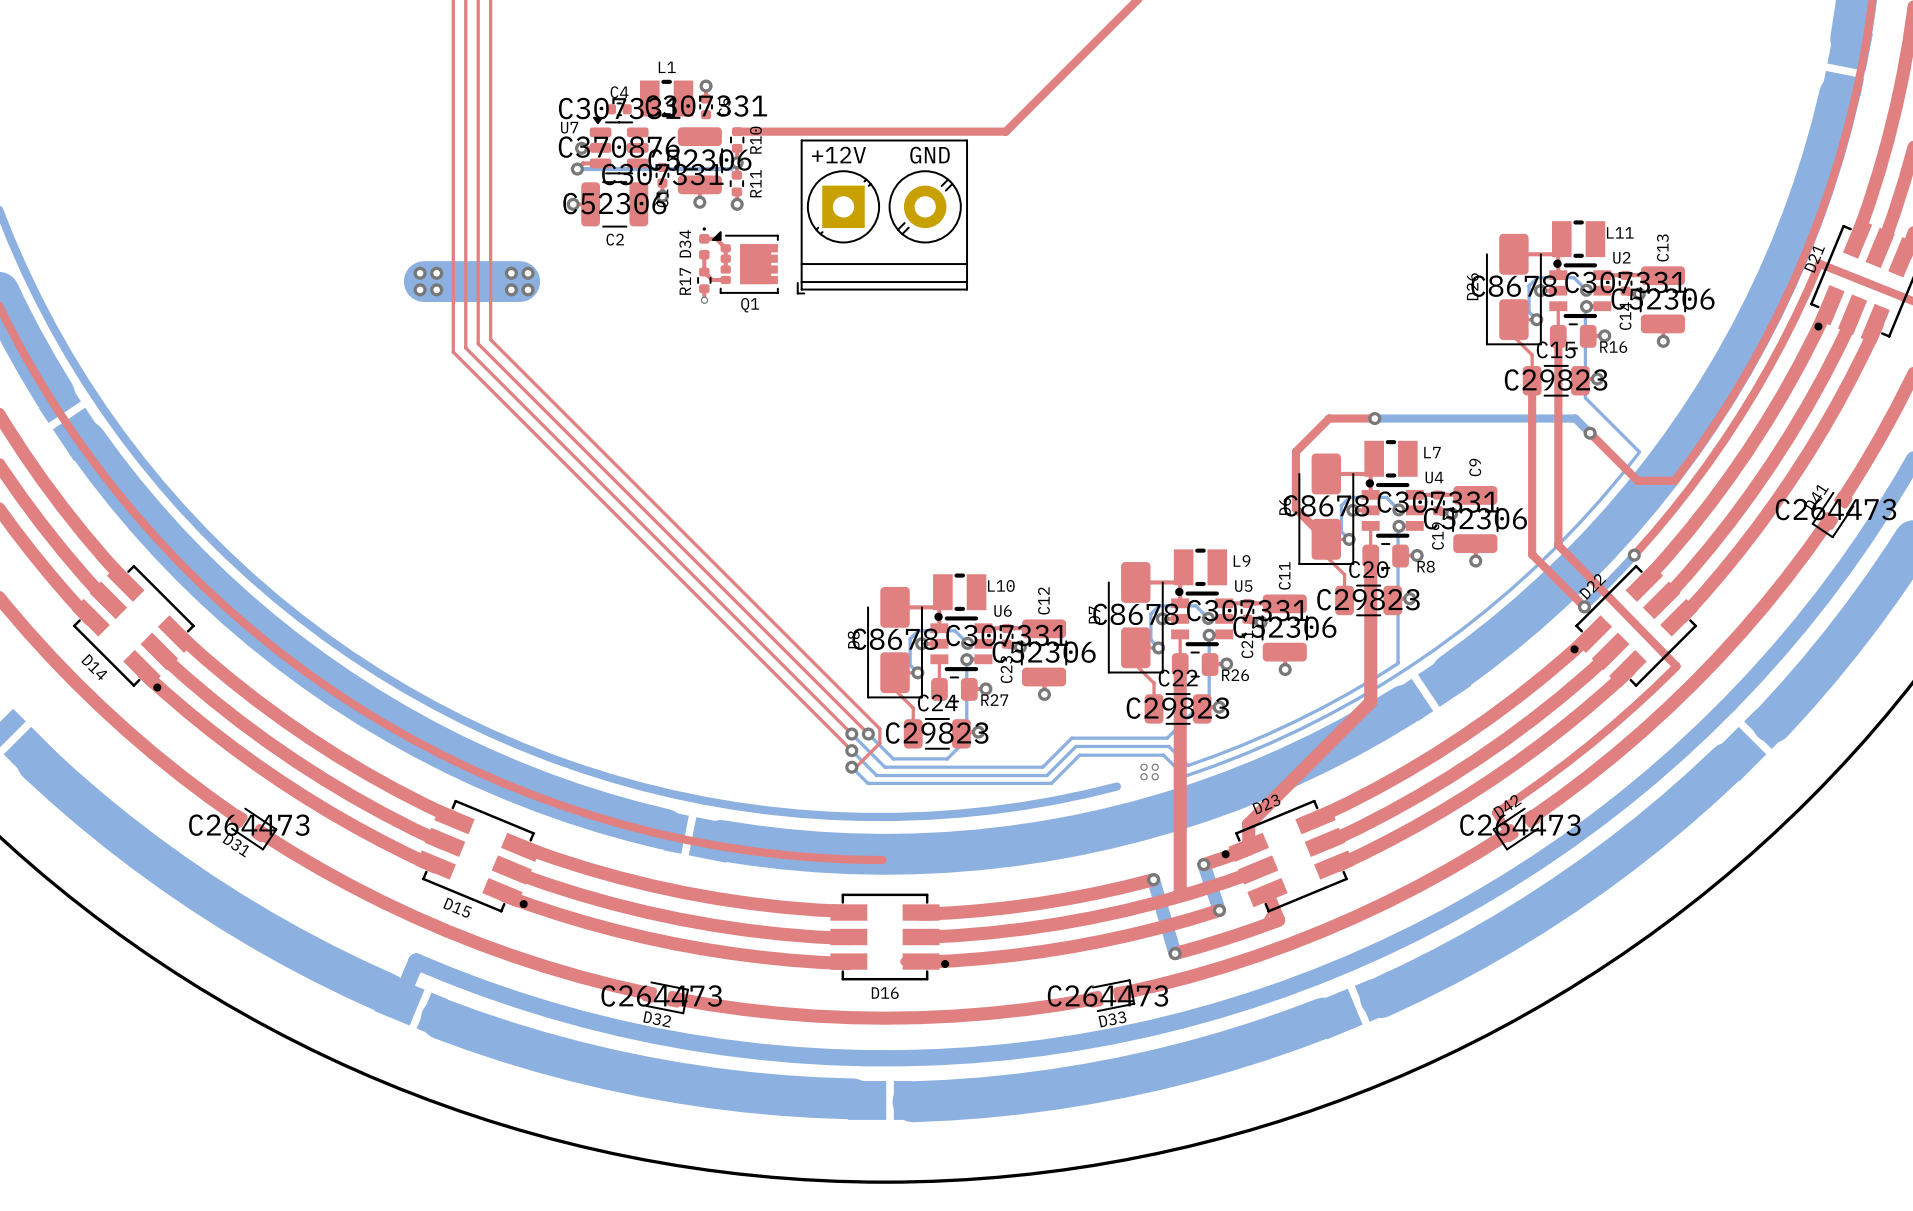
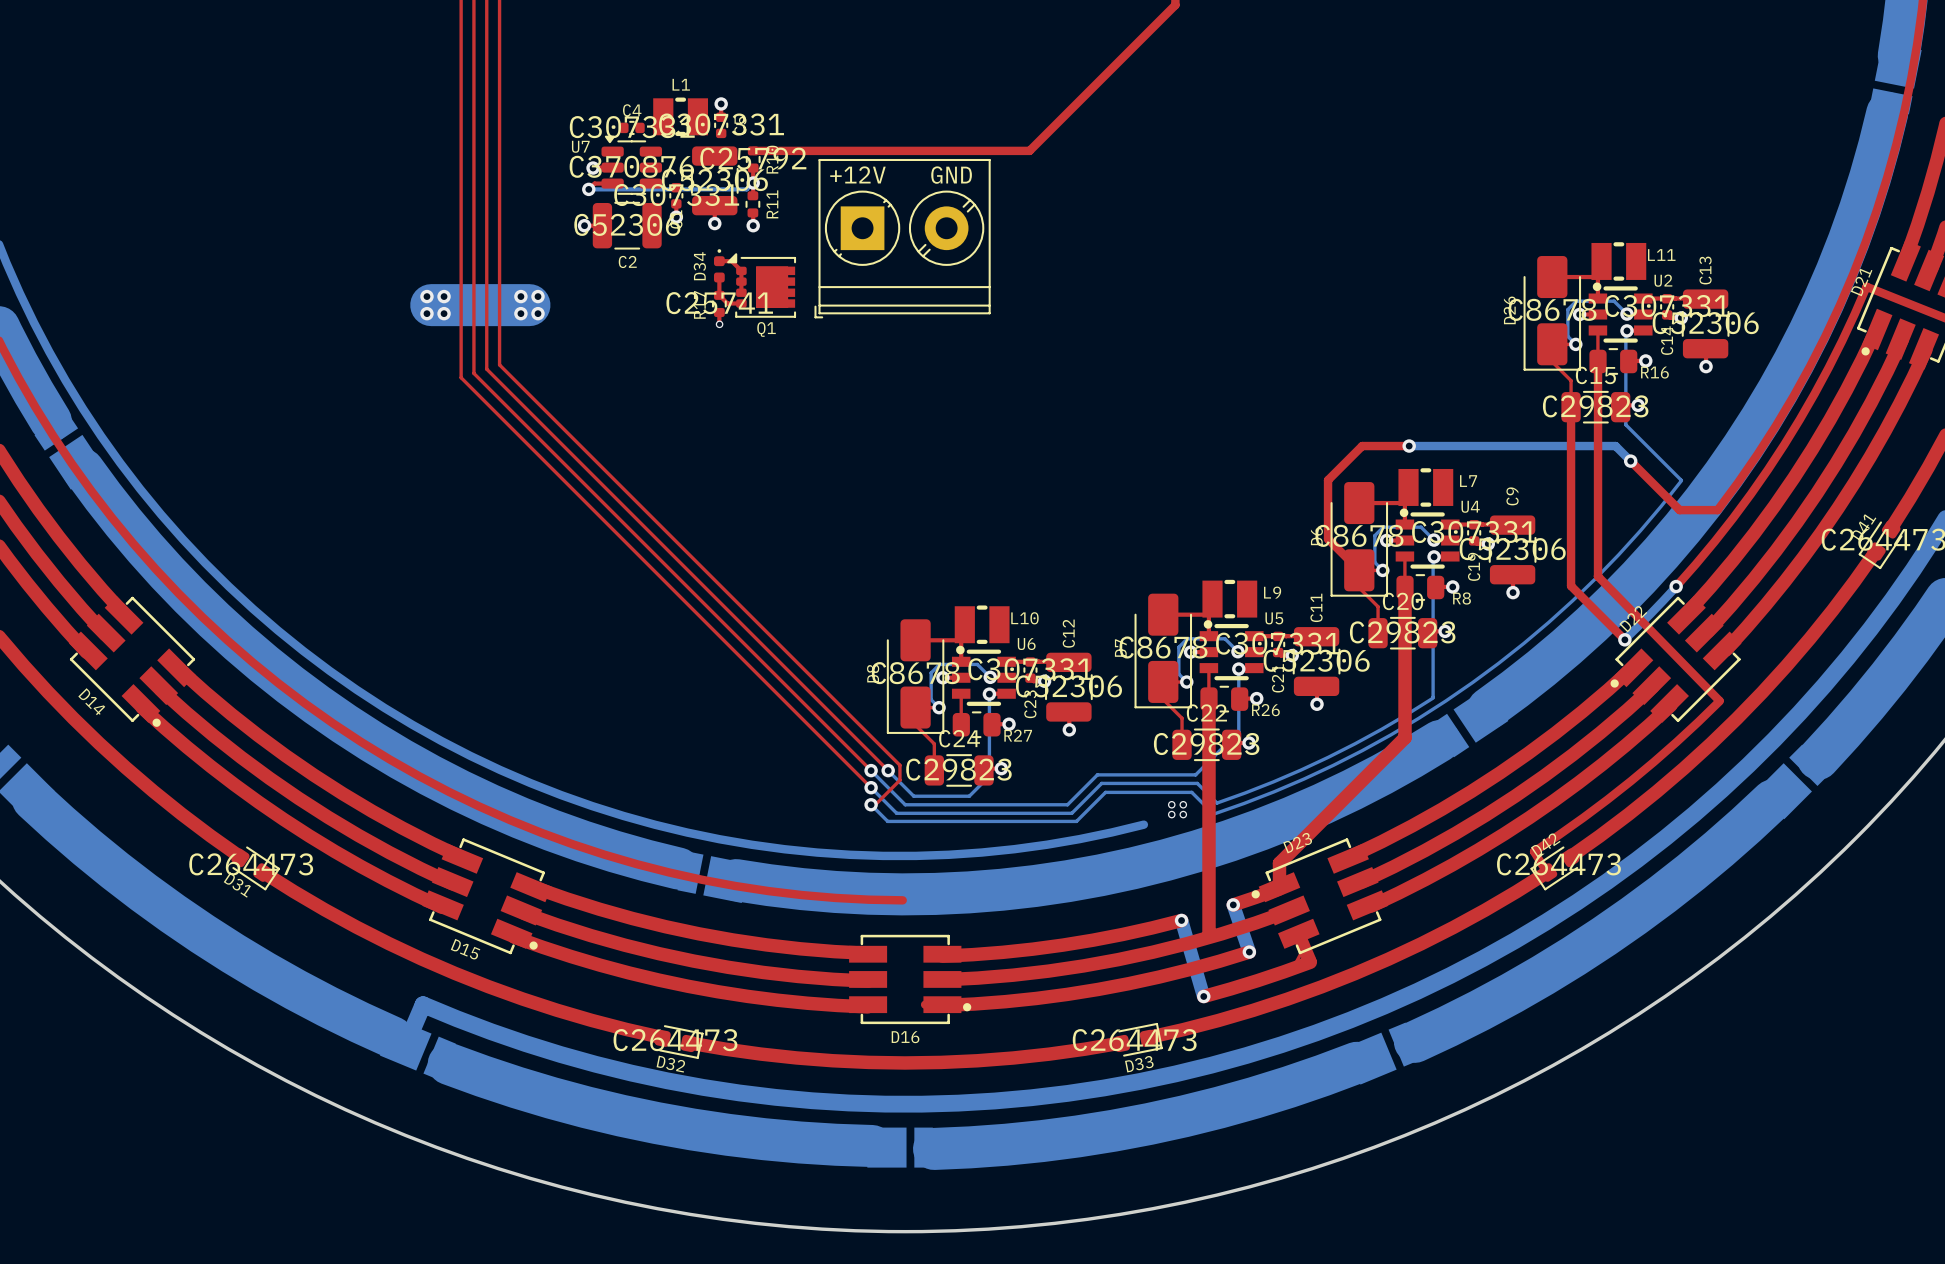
R10 text: none -> C25792 (753, 158)
R17 text: none -> C25741 (719, 303)

